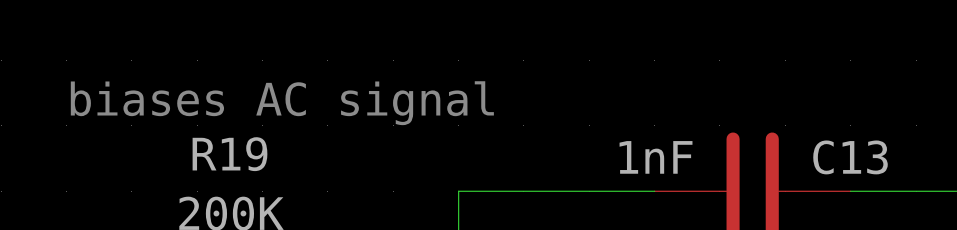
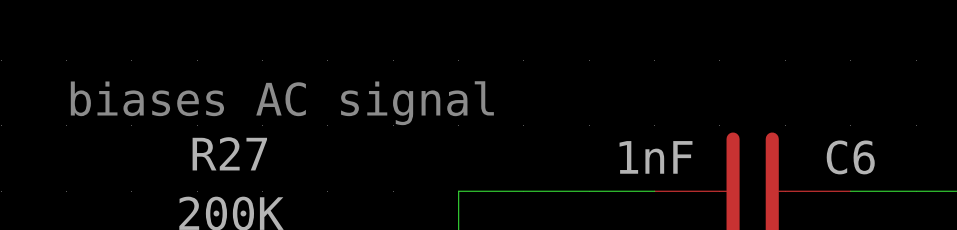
R19 name: R19 (229, 154) -> R27 (229, 153)
C13 name: C13 (850, 157) -> C6 (850, 157)

